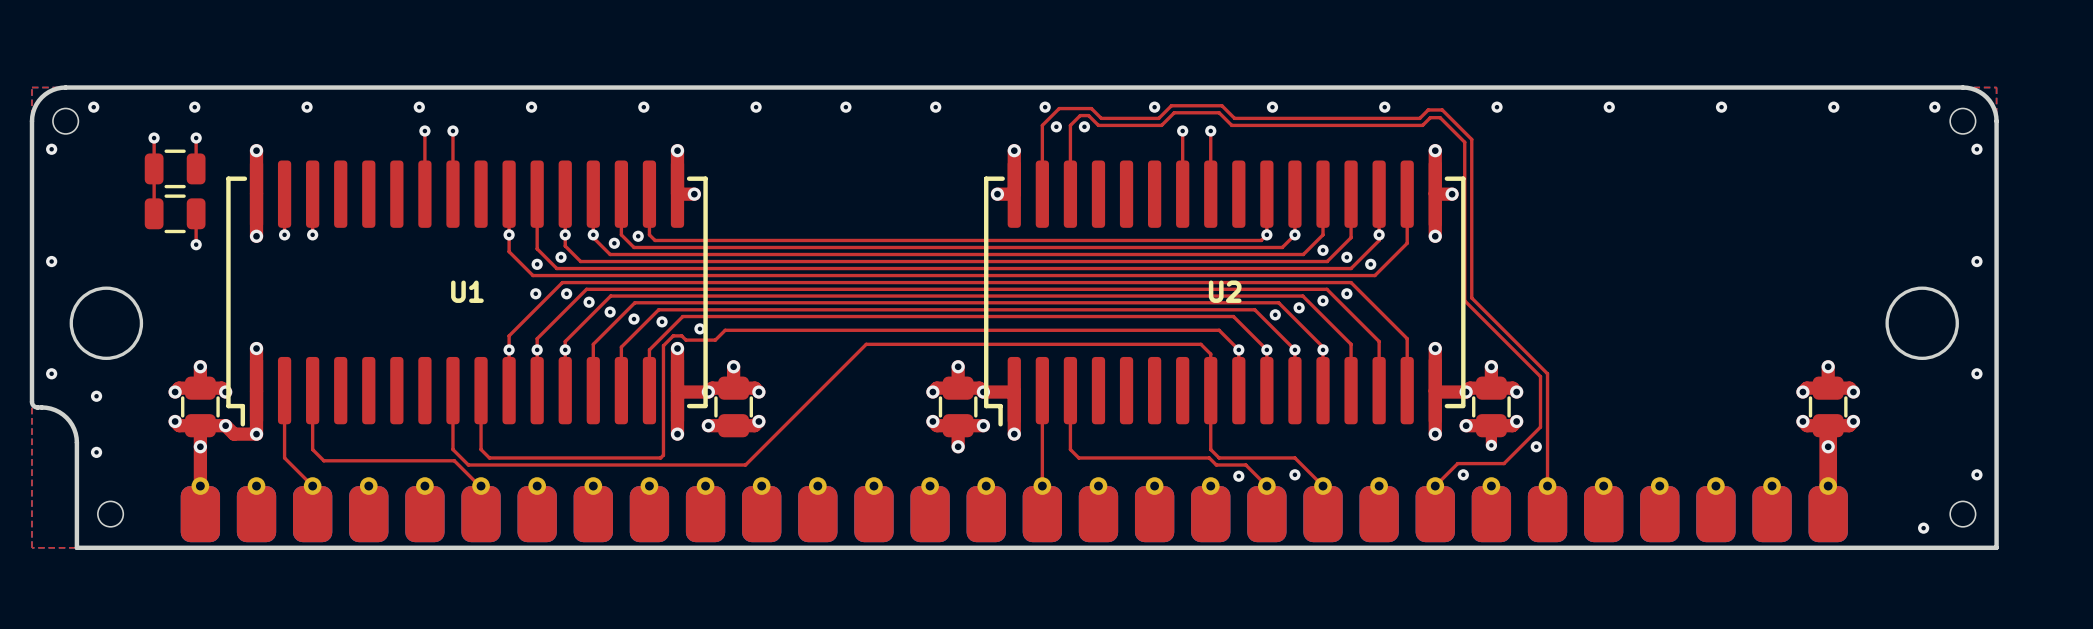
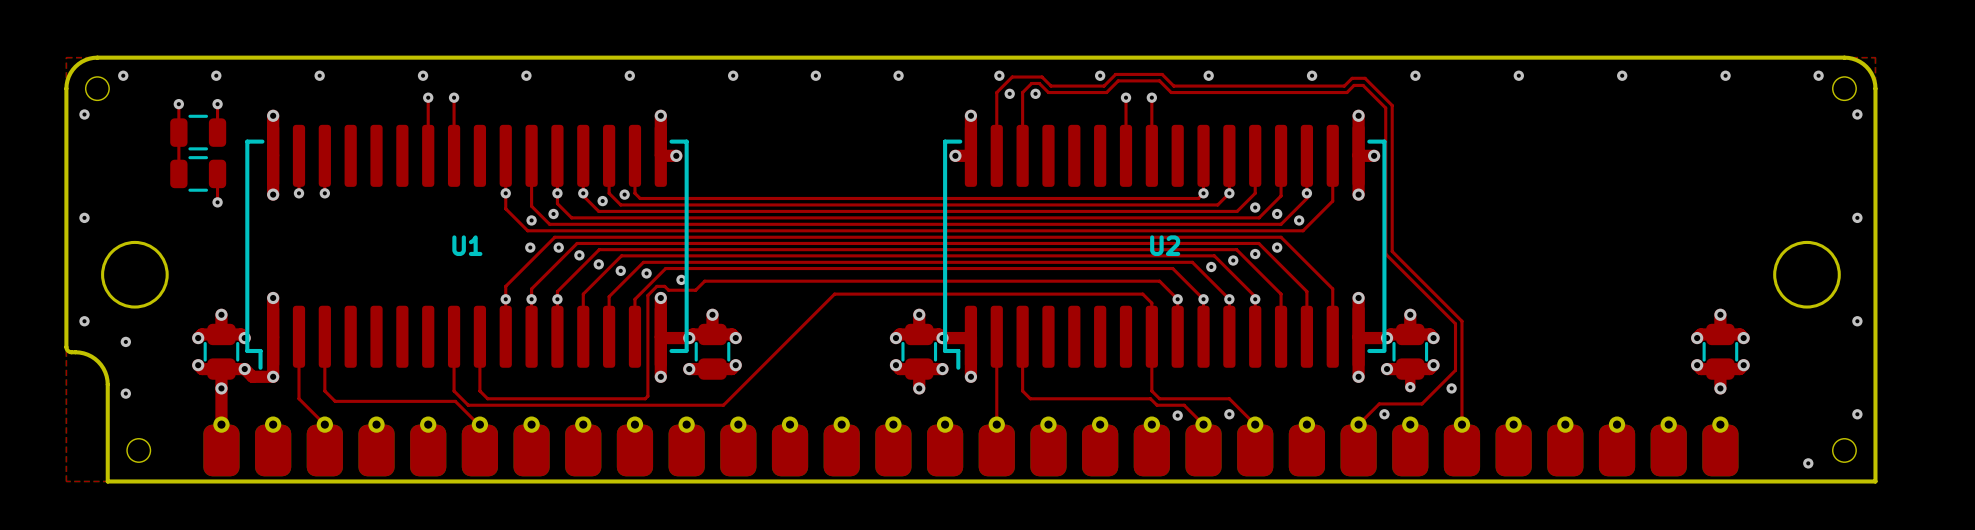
top track: (1828, 425) (1828, 486) -> none

